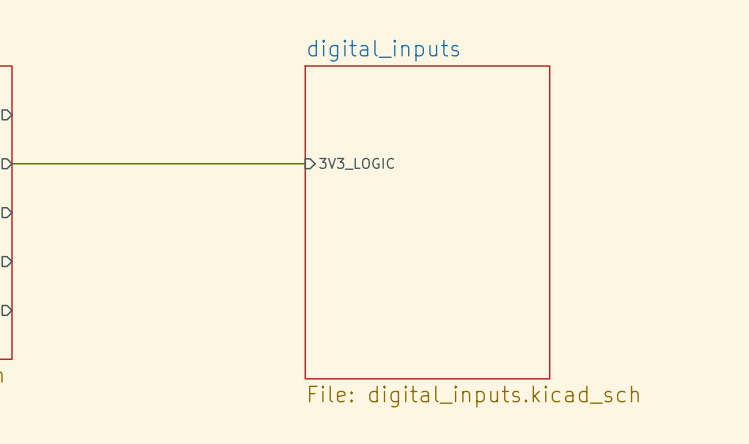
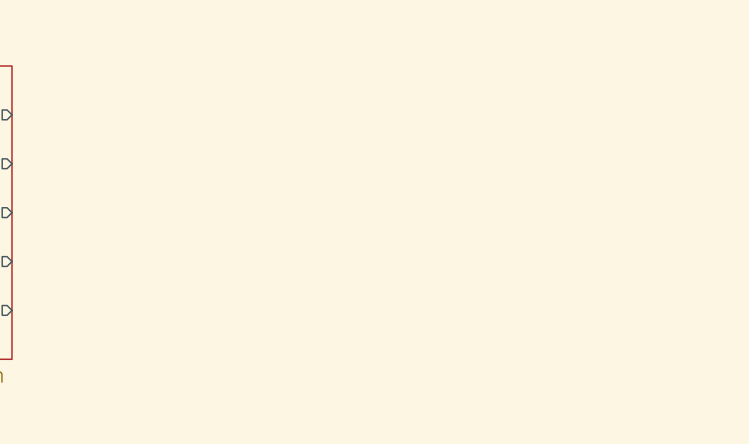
wire: (11, 163) (305, 163) -> none
sheet pin: 3V3_LOGIC (356, 163) -> none
sheet digital_inputs: File: digital_inputs.kicad_sch (427, 222) -> none

